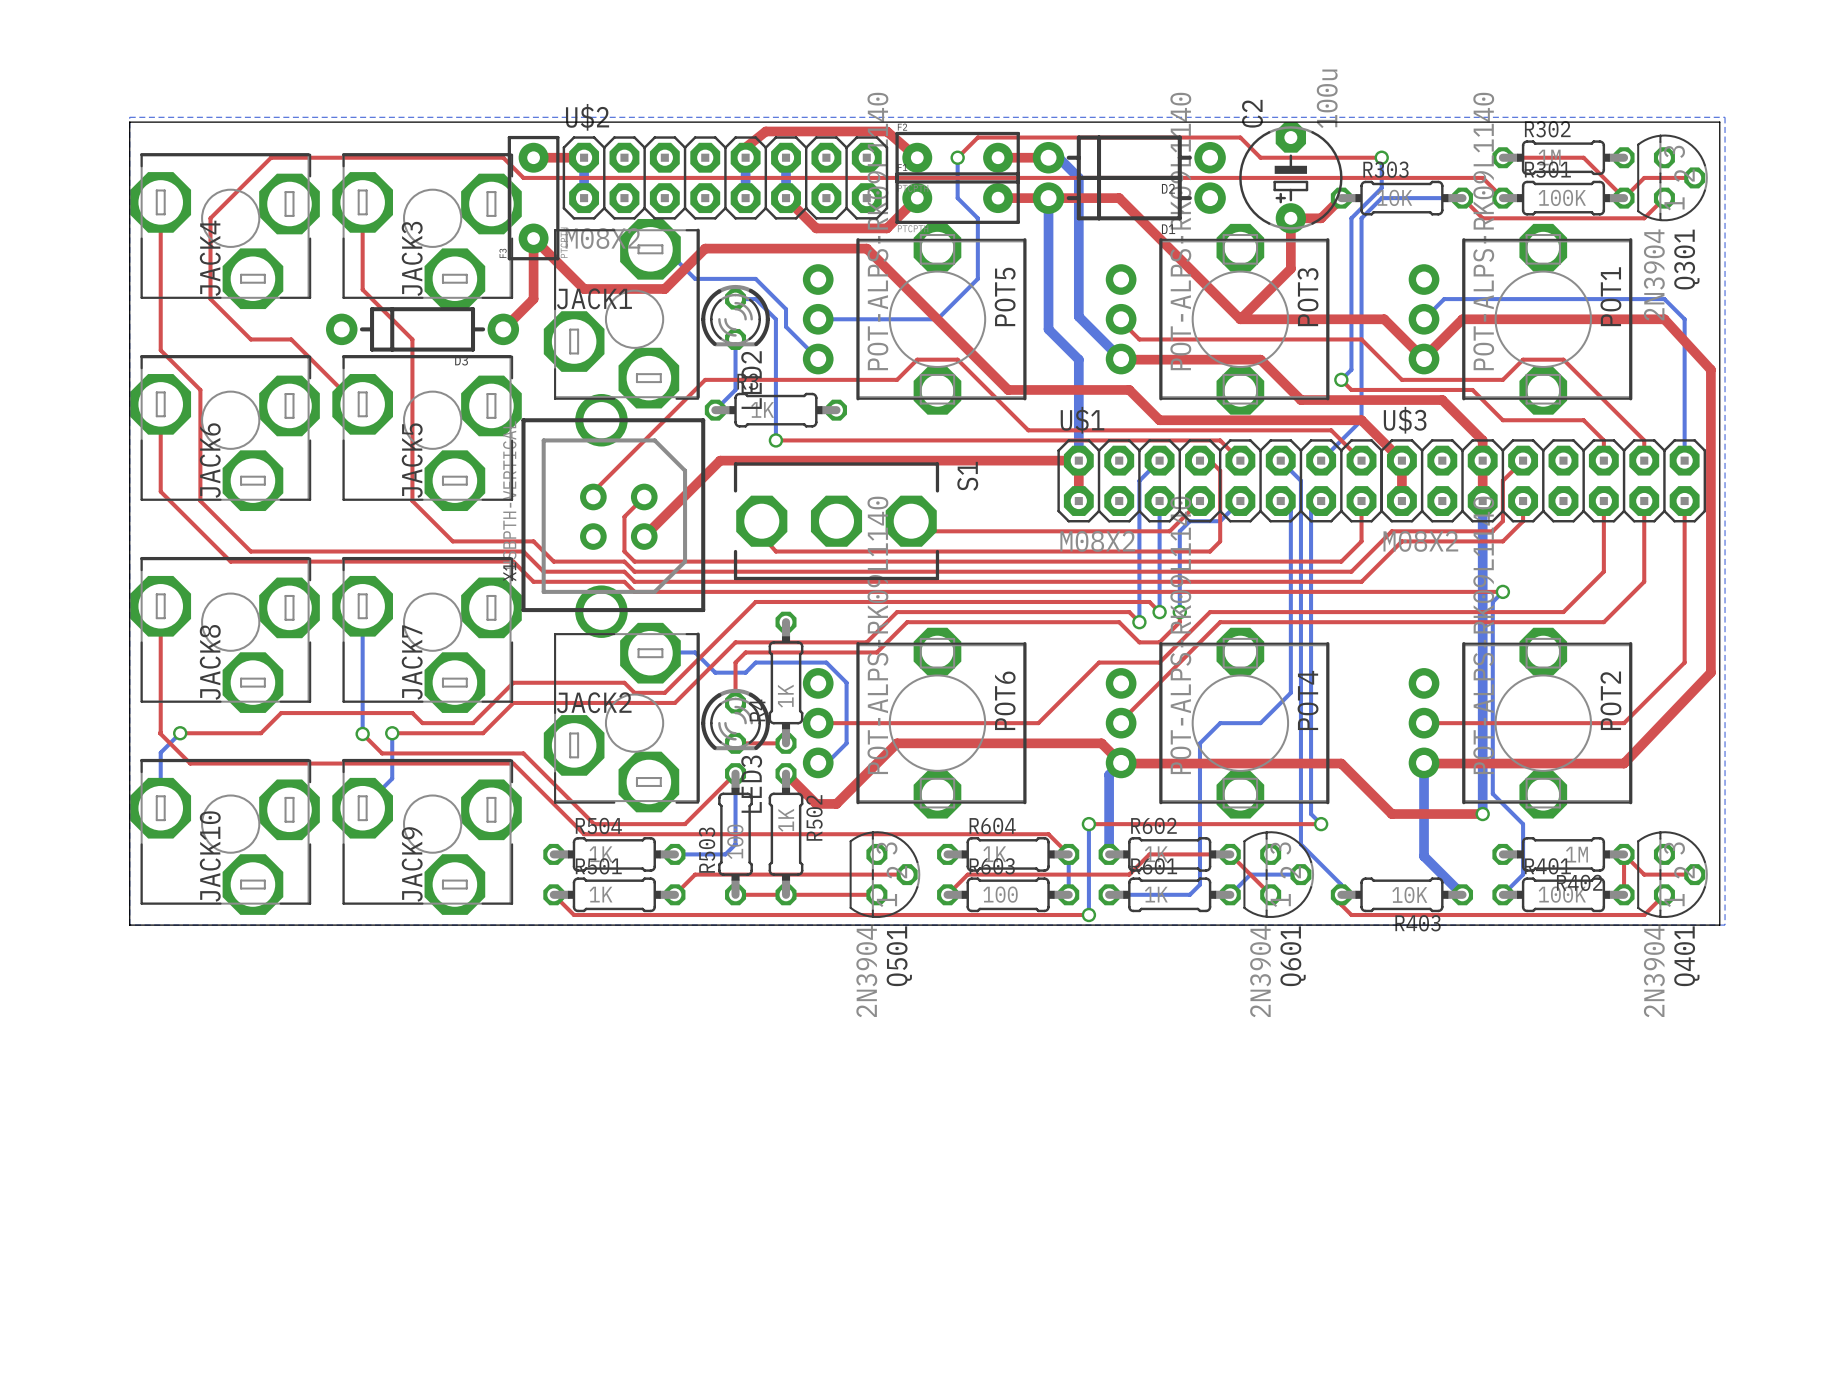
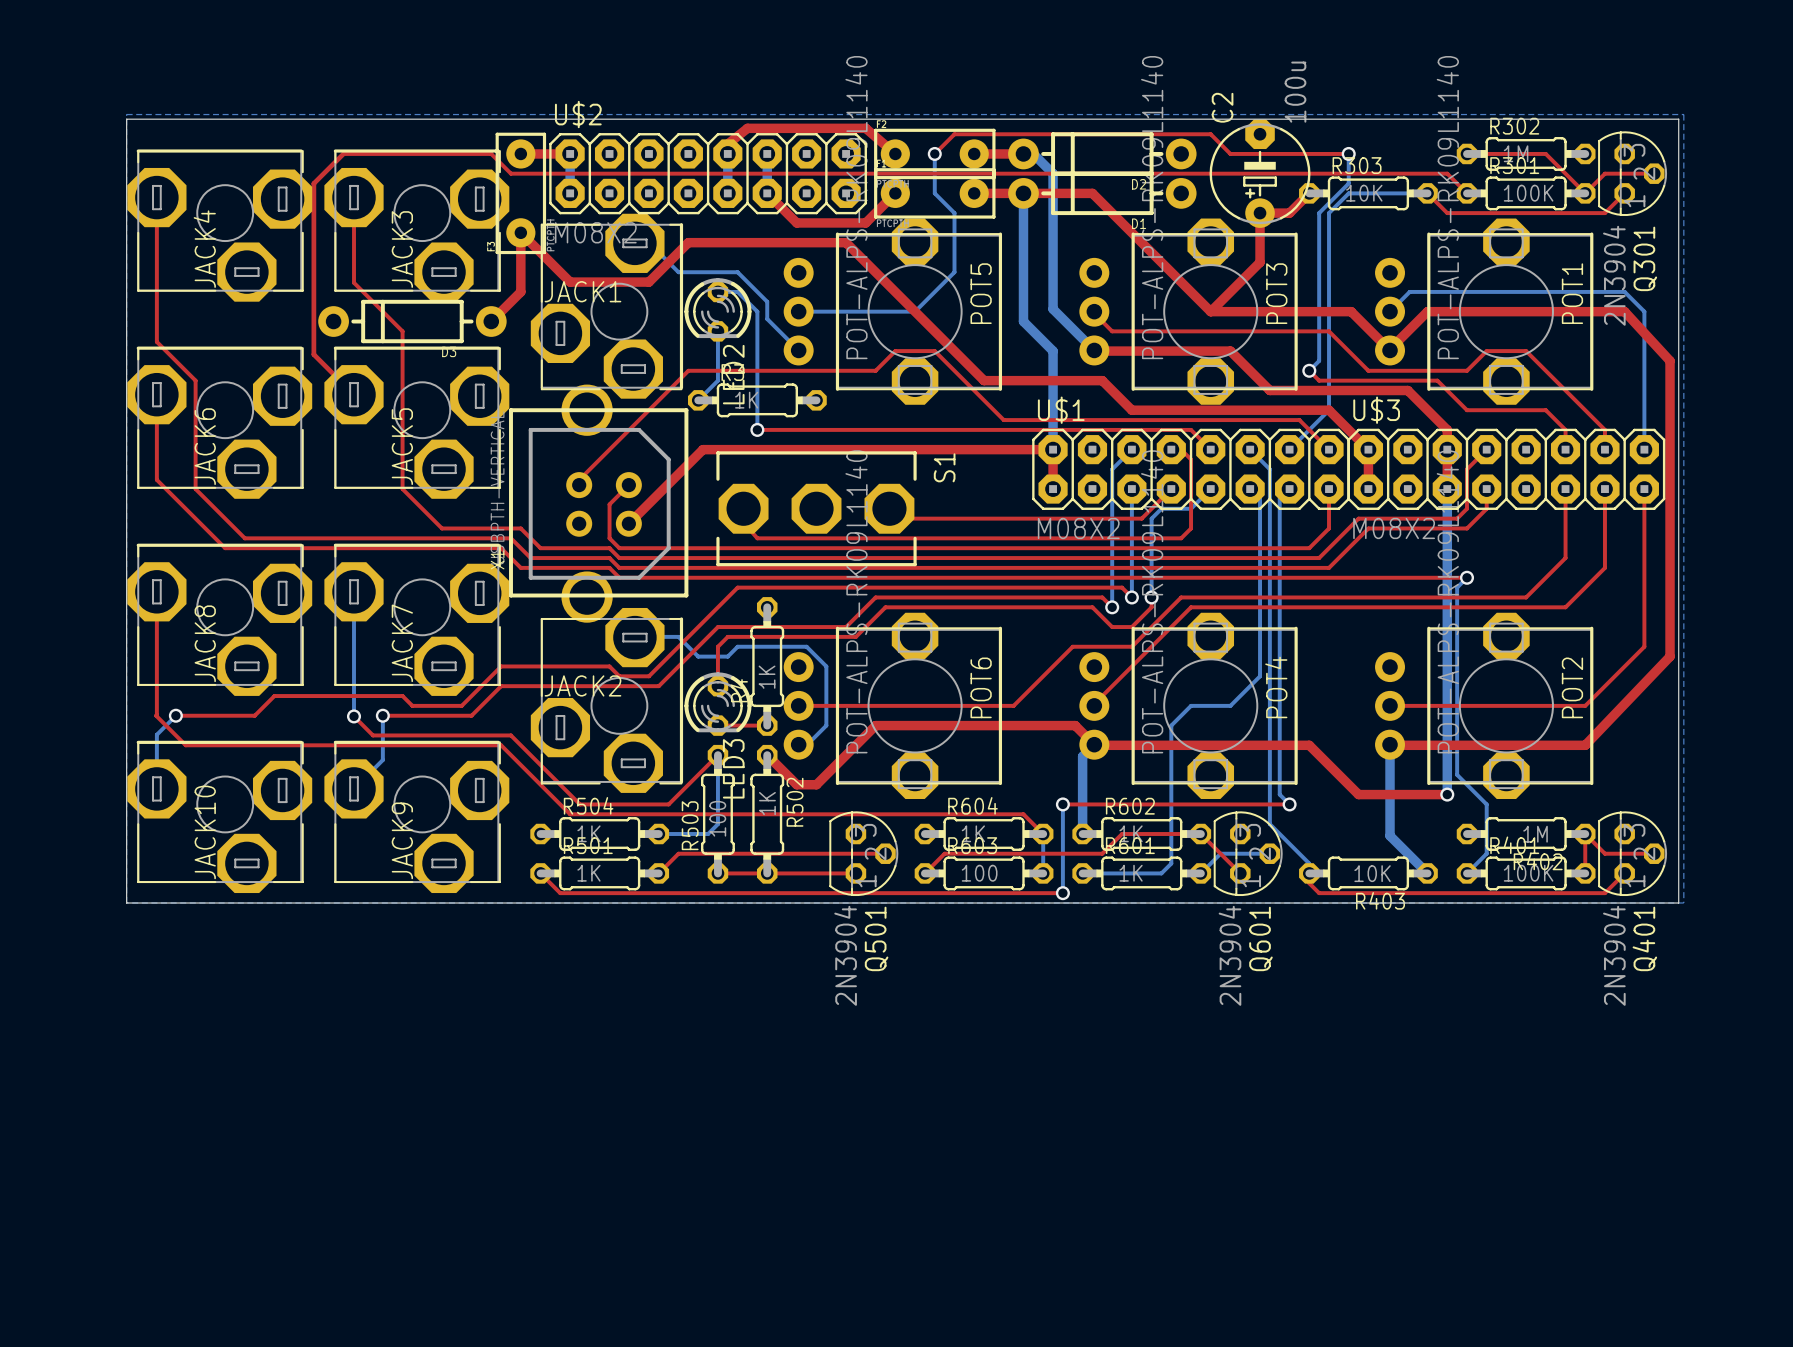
top track: (351, 157) (271, 157) (210, 218) (210, 299) (250, 339) (291, 339) (356, 404) (362, 404) -> (343, 153) (313, 183) (313, 354) (354, 394)

